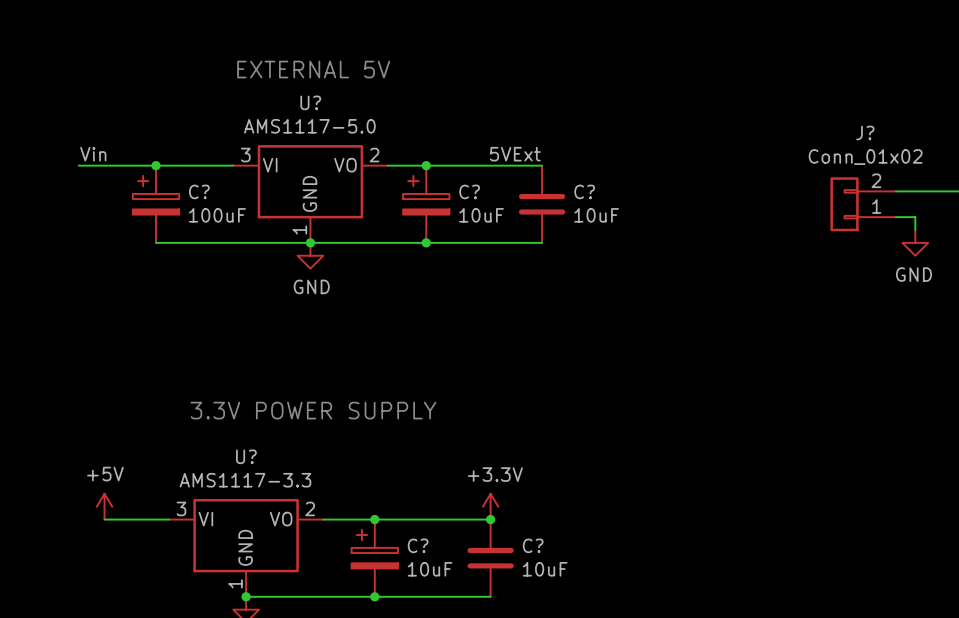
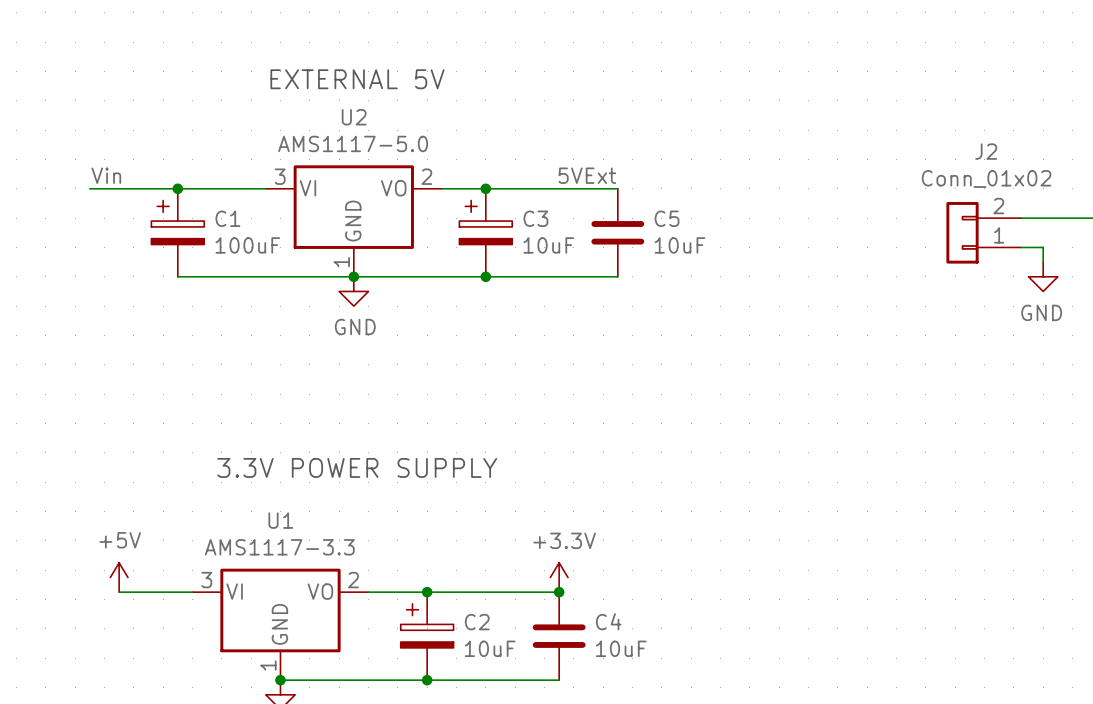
U? name: U? (310, 102) -> U2 (354, 117)
J? name: J? (865, 133) -> J2 (986, 151)
C? name: C? (199, 191) -> C1 (227, 218)
C? name: C? (469, 191) -> C3 (535, 218)
C? name: C? (584, 191) -> C5 (667, 218)
U? name: U? (246, 456) -> U1 (280, 520)
C? name: C? (418, 545) -> C2 (477, 622)
C? name: C? (533, 545) -> C4 (608, 621)

